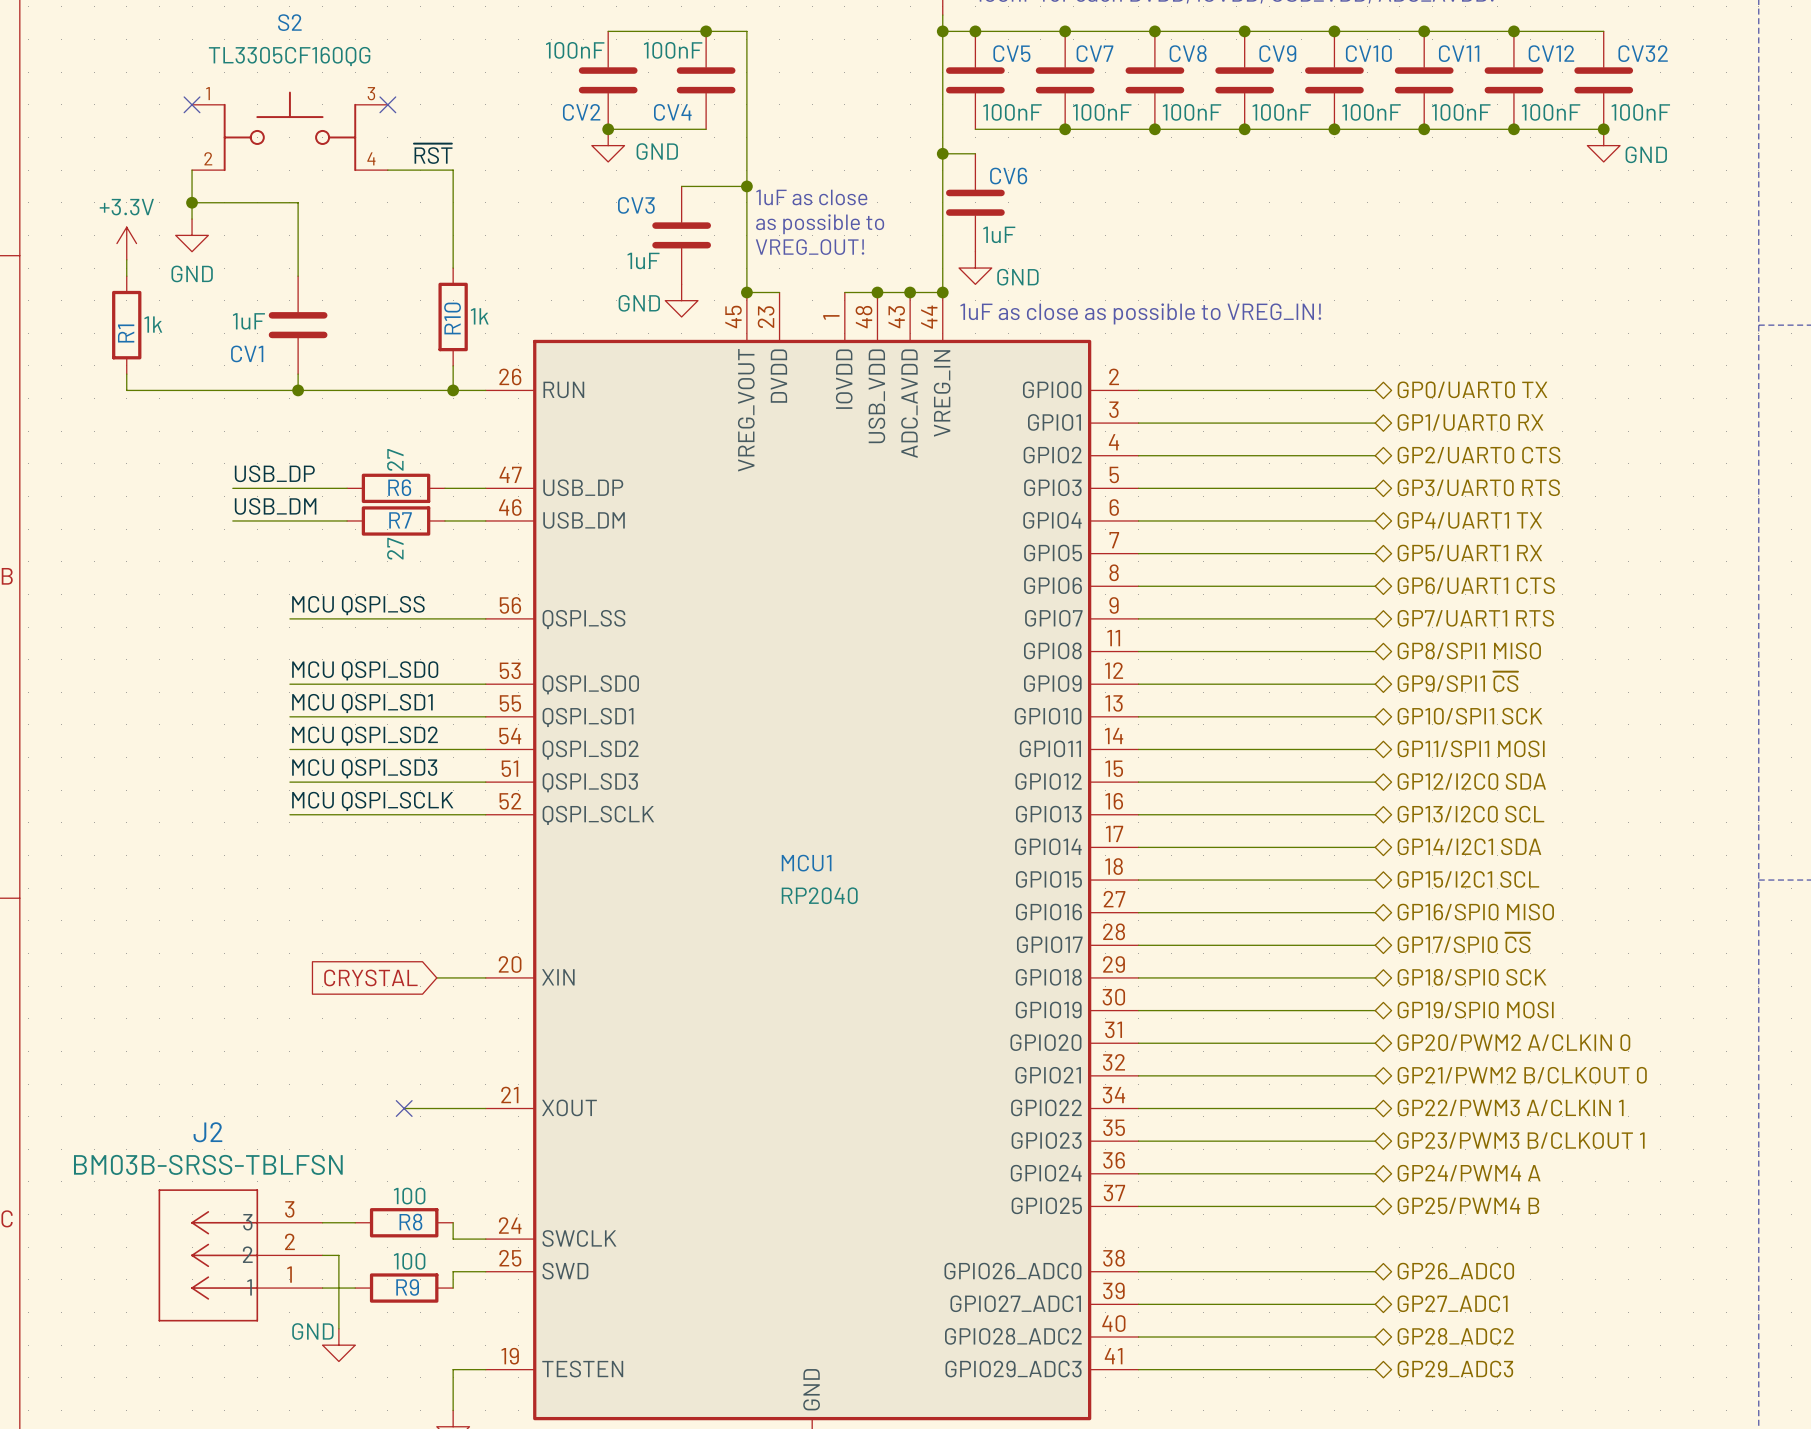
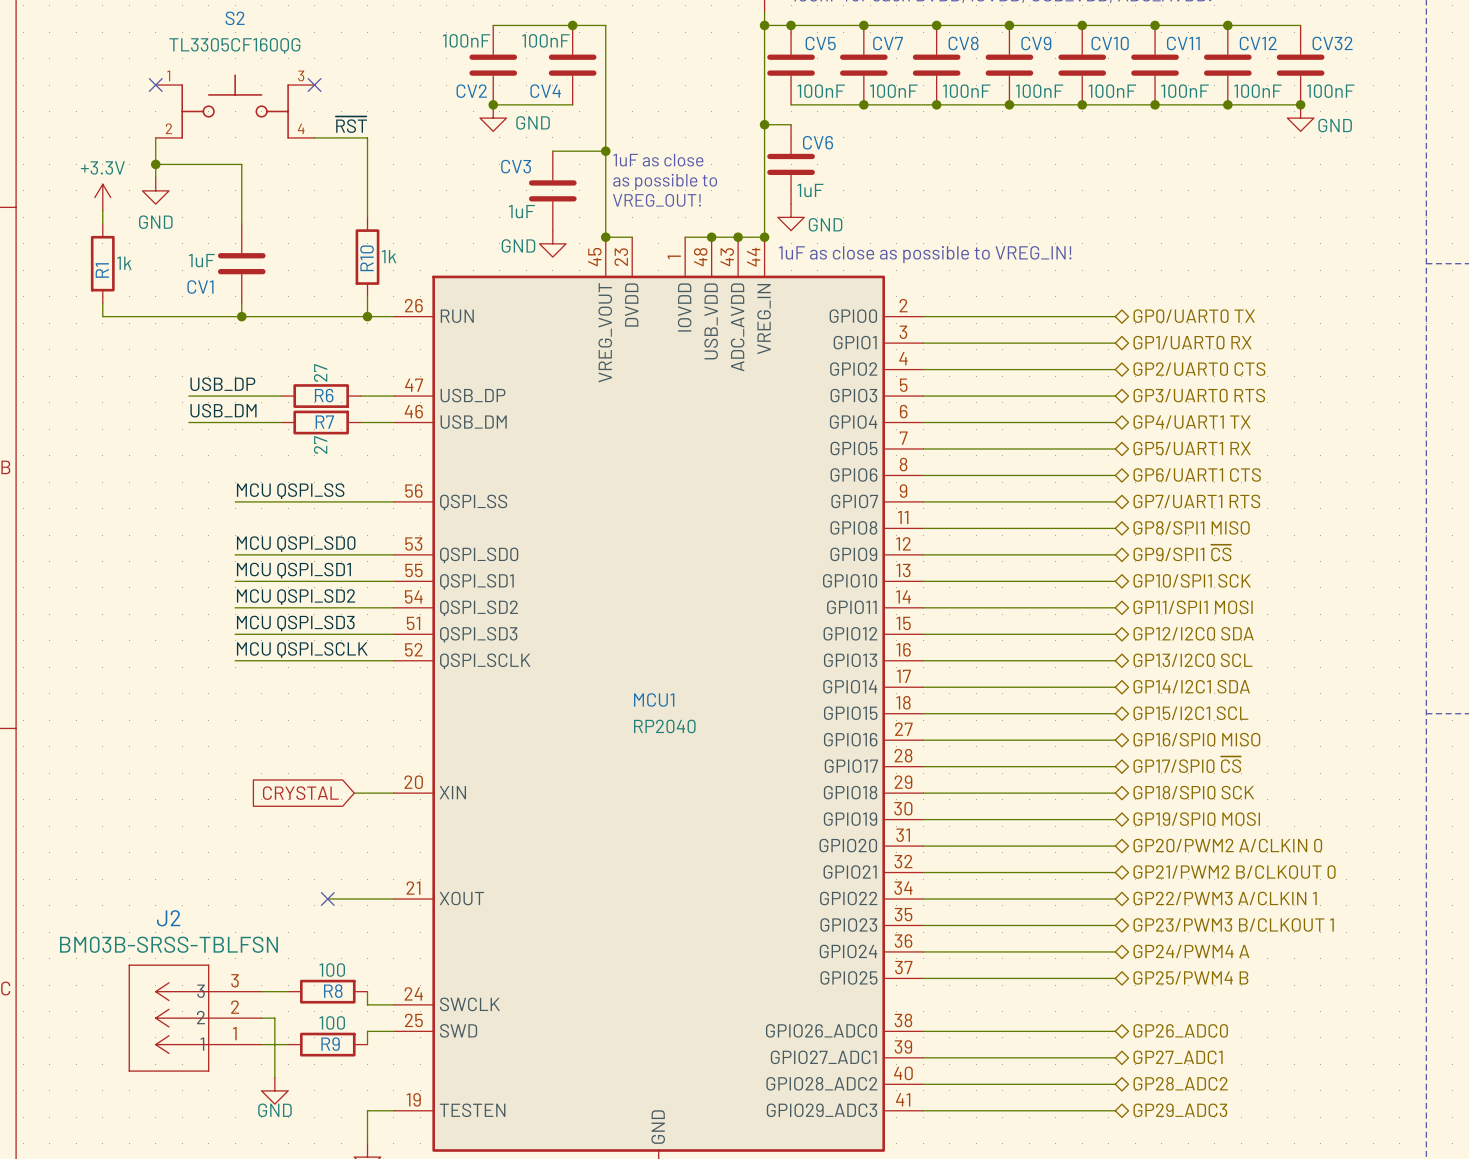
power symbol text position: GND (312, 1331) -> GND (274, 1110)

